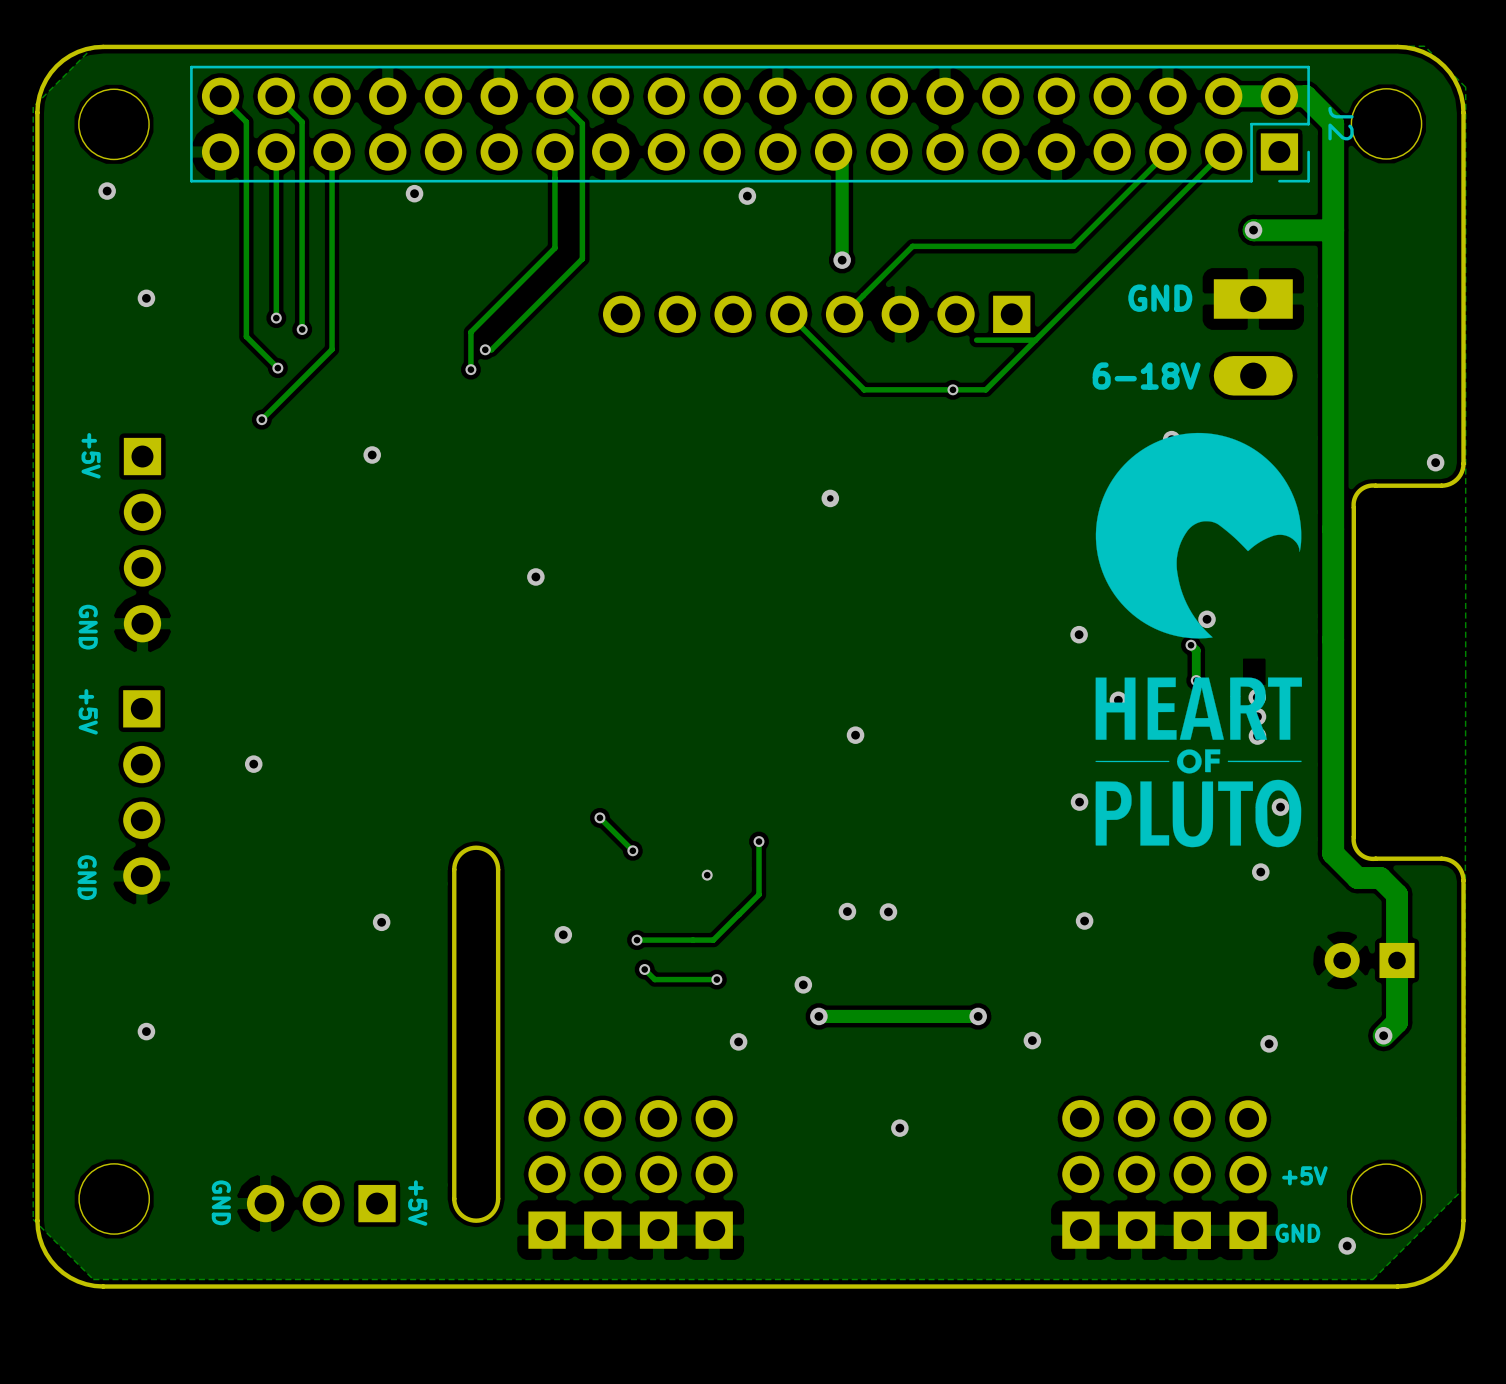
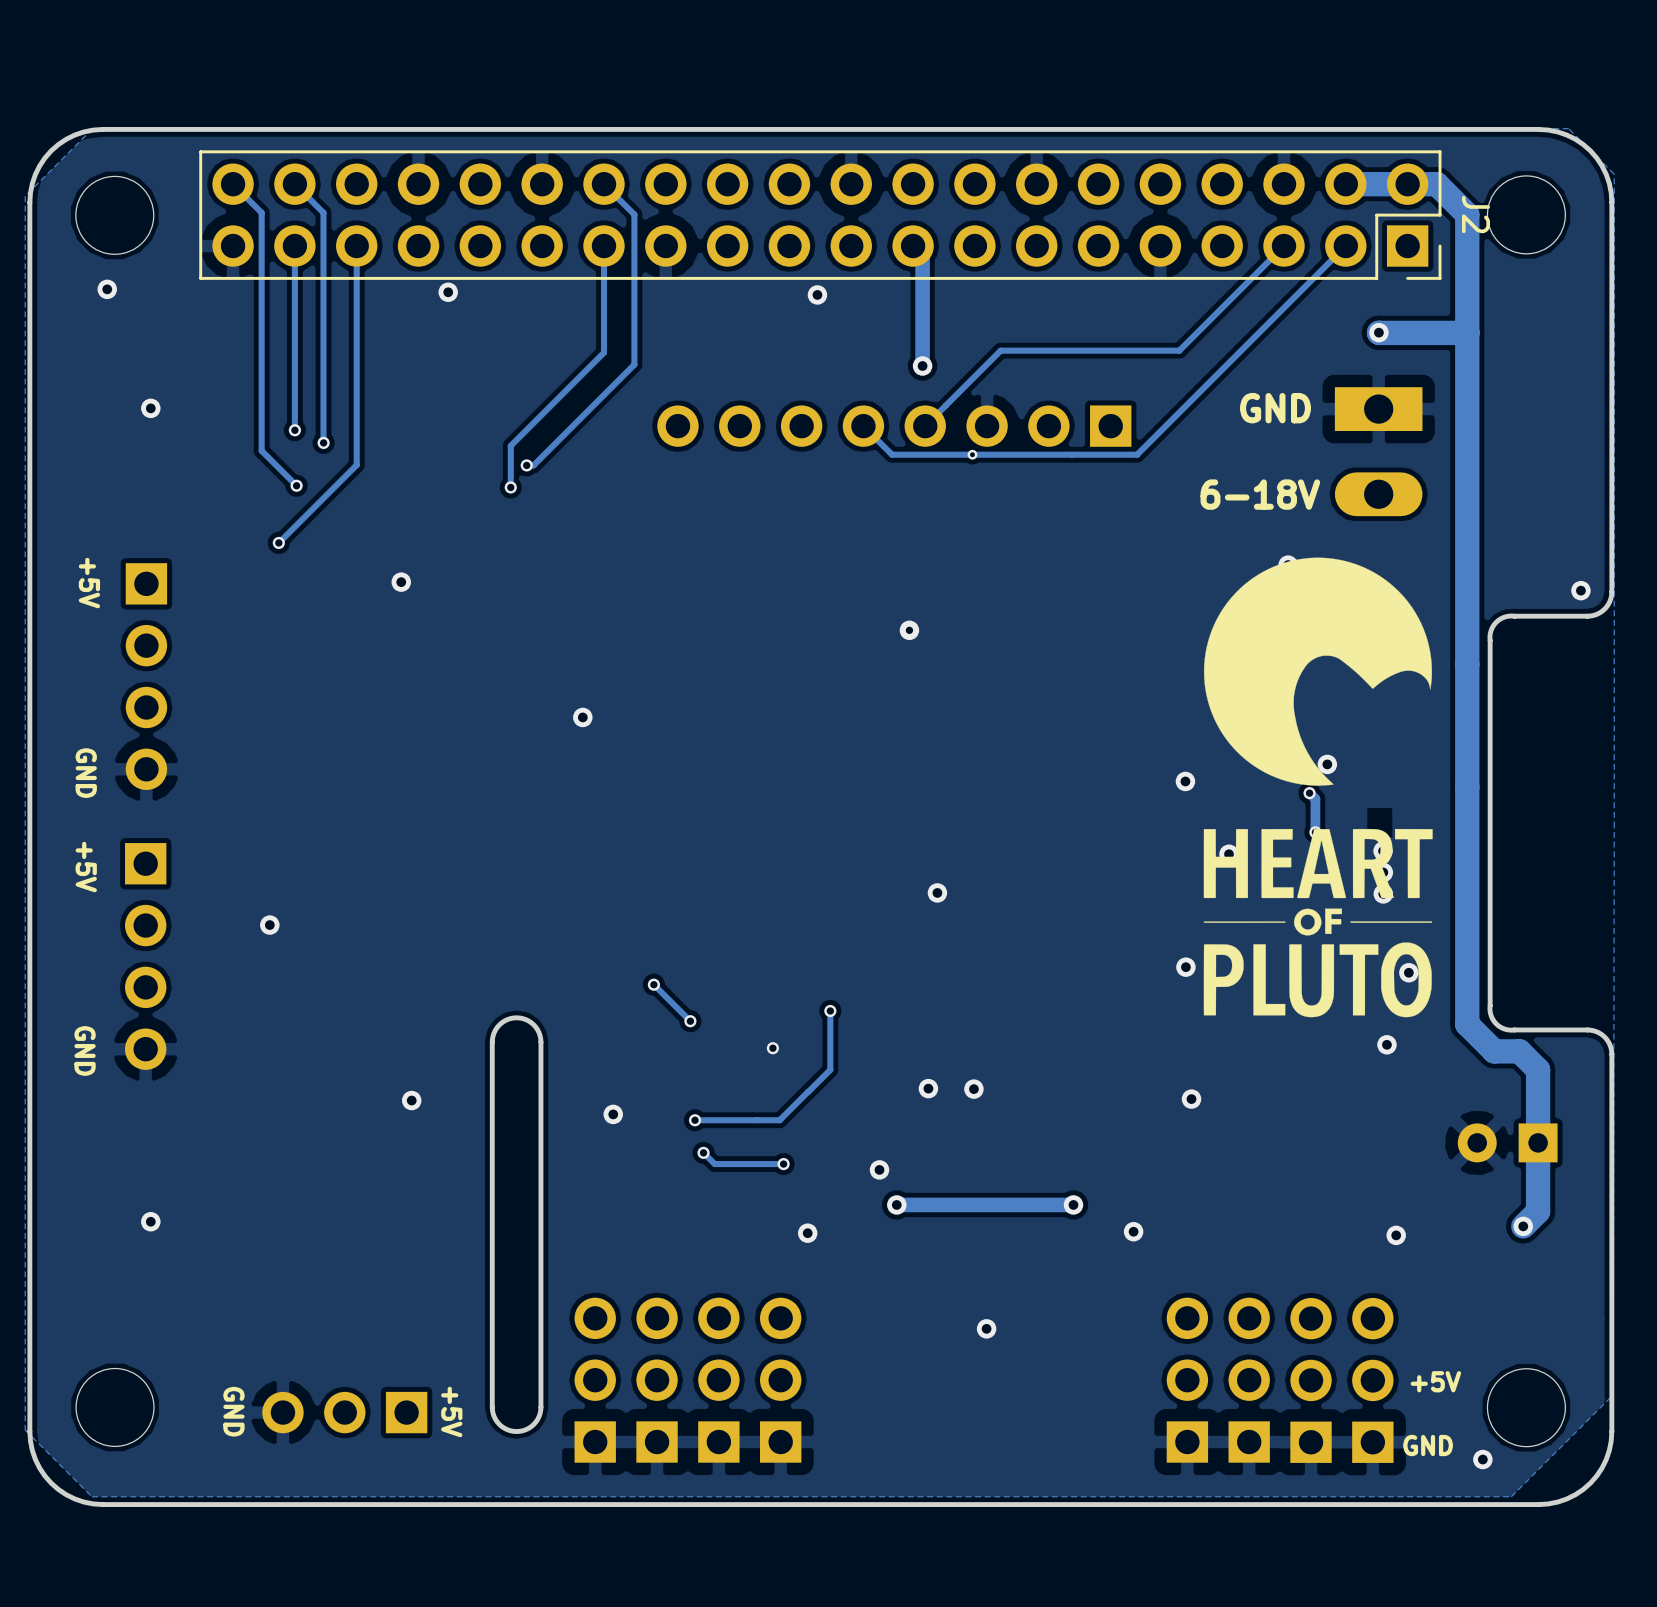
track: (814, 340) (864, 389) -> (892, 454) (1071, 454)
via: none -> (972, 454)
track: (1035, 340) (985, 389) -> none
via: (952, 389) -> none
track: (985, 389) (864, 389) (985, 389) -> none

